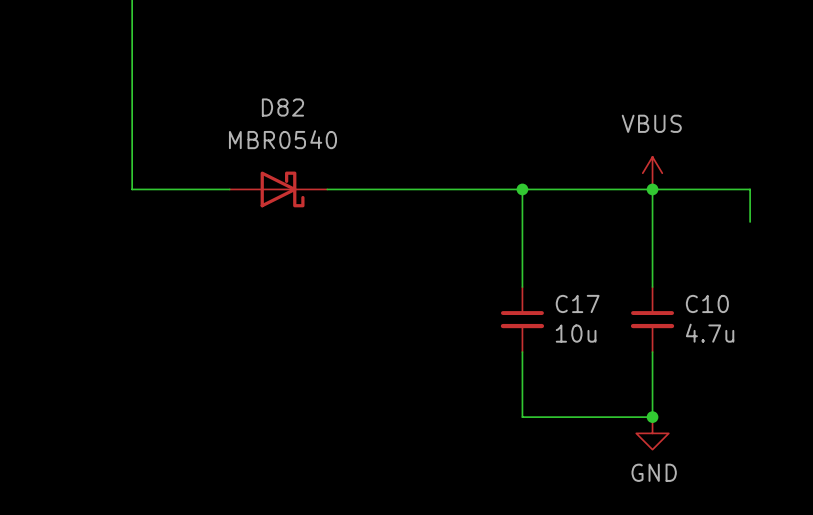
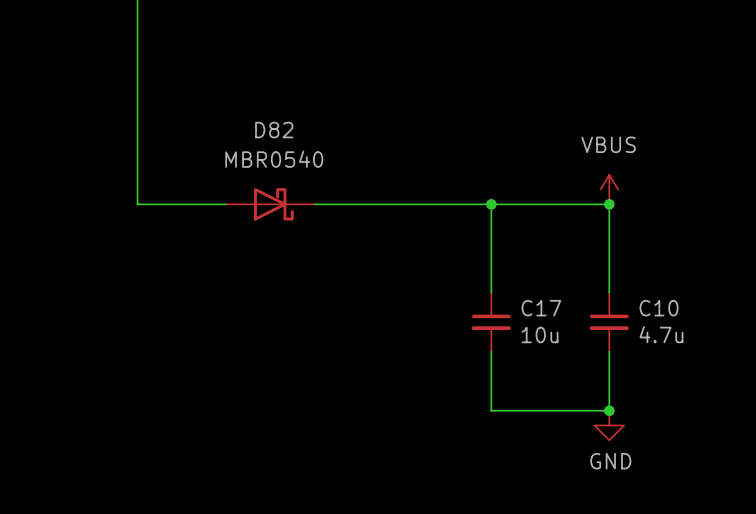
wire: (652, 189) (750, 189) (750, 221) -> none

